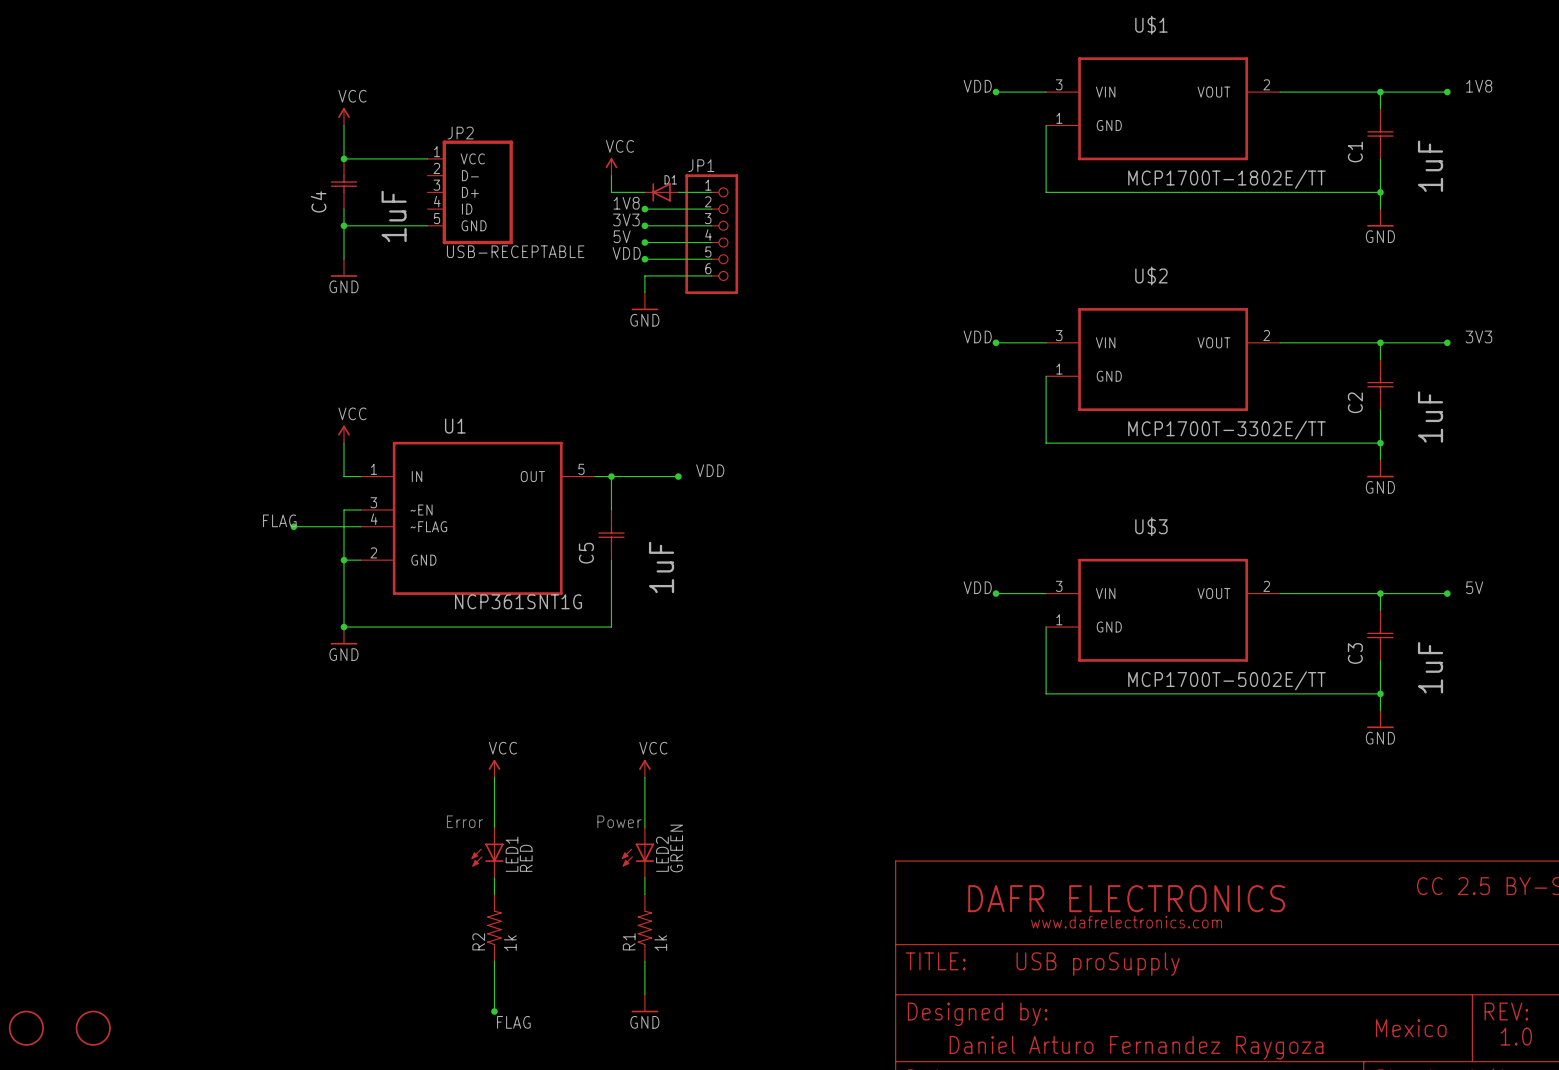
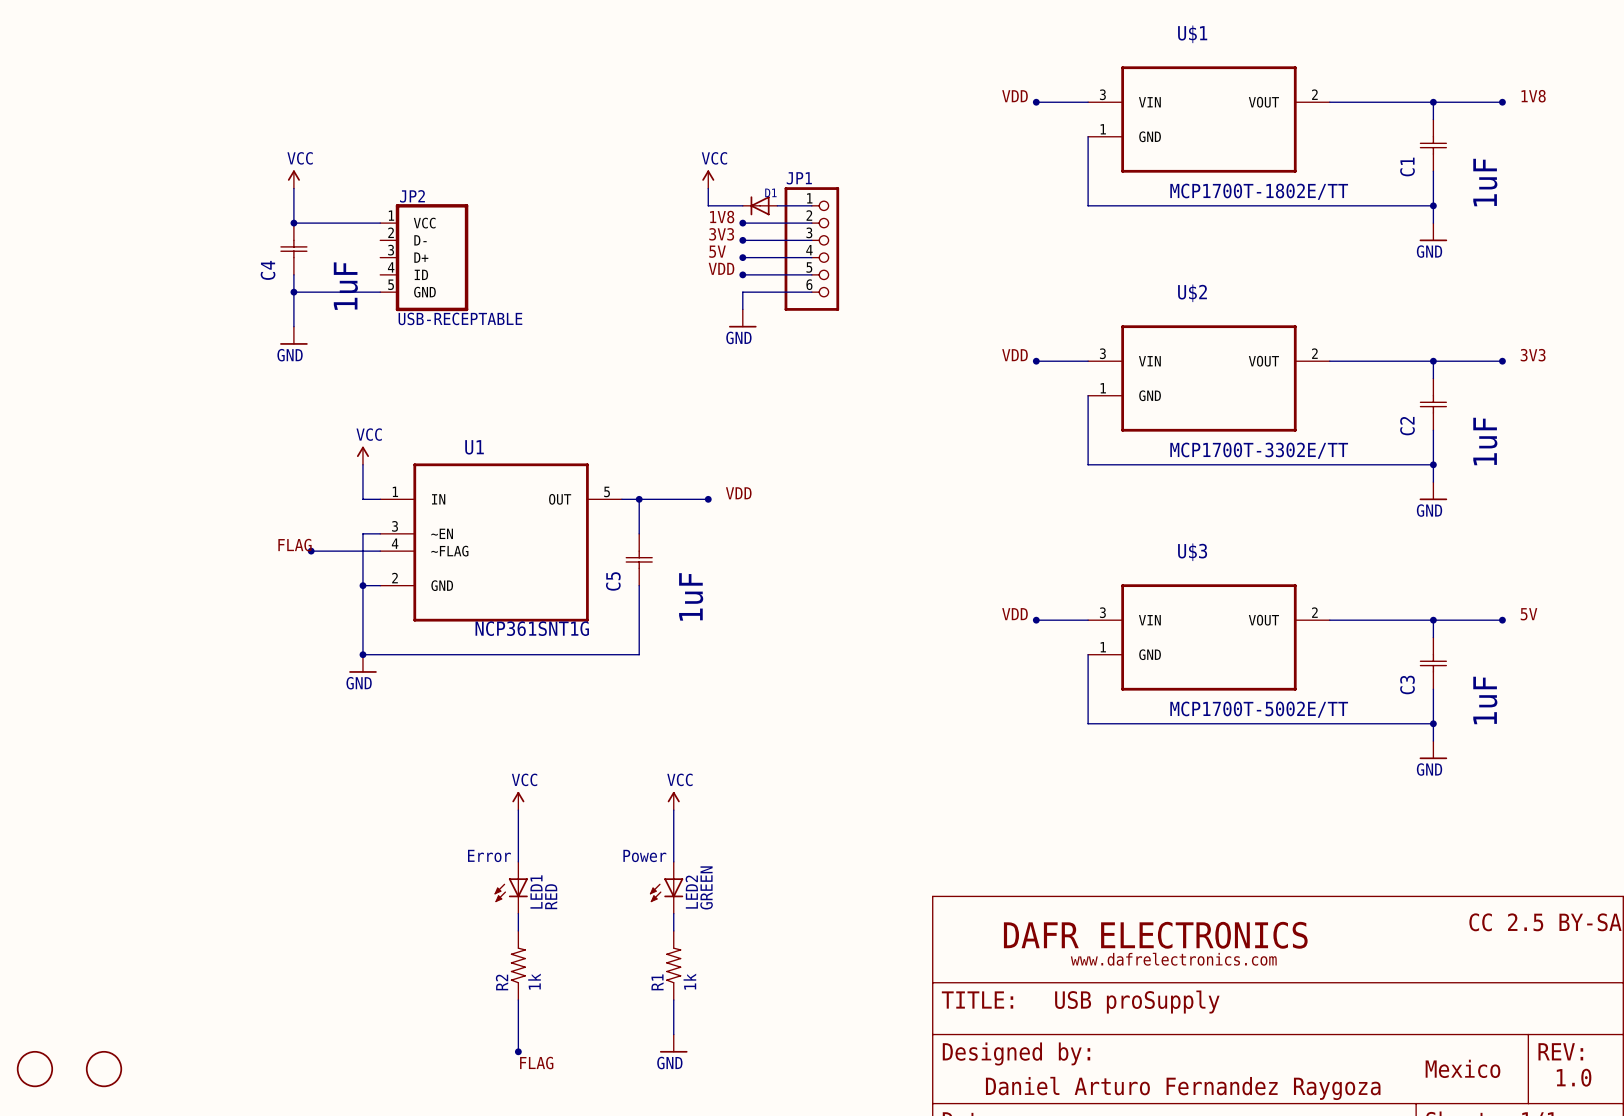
power symbol position: VCC (344, 116) -> VCC (293, 179)
wire: (344, 125) (344, 158) (427, 158) -> (293, 188) (293, 223) (380, 223)
junction: (344, 158) -> none
power symbol position: VCC (611, 166) -> VCC (708, 179)
wire: (611, 175) (611, 192) (644, 192) -> none
wire: none -> (708, 188) (708, 205)
C4 position: (344, 184) -> (293, 248)
JP2 position: (470, 192) -> (424, 257)
D1 position: (661, 192) -> (760, 205)
wire: none -> (777, 205) (811, 205)
label position: 1V8 (626, 203) -> 1V8 (722, 217)
junction: none -> (293, 223)
wire: (344, 209) (344, 259) -> (293, 274) (293, 326)
wire: (644, 209) (711, 209) -> (811, 223) (742, 223)
junction: (644, 209) -> none
junction: none -> (742, 223)
label position: 3V3 (626, 219) -> 3V3 (721, 234)
wire: (344, 225) (427, 225) -> (293, 292) (380, 292)
junction: (344, 225) -> none
wire: (644, 225) (711, 225) -> (811, 240) (742, 240)
junction: (644, 225) -> none
junction: none -> (742, 240)
JP1 position: (711, 234) -> (811, 248)
label position: 5V (622, 236) -> 5V (717, 251)
wire: (644, 242) (711, 242) -> (811, 257) (742, 257)
junction: (644, 242) -> none
junction: none -> (742, 257)
label position: VDD (626, 253) -> VDD (721, 268)
wire: (644, 259) (711, 259) -> (811, 274) (742, 274)
junction: (644, 259) -> none
junction: none -> (742, 274)
power symbol position: GND (344, 268) -> GND (293, 335)
junction: none -> (293, 292)
wire: (711, 275) (644, 275) (644, 292) -> (811, 292) (742, 292) (742, 309)
power symbol position: GND (644, 301) -> GND (742, 318)

